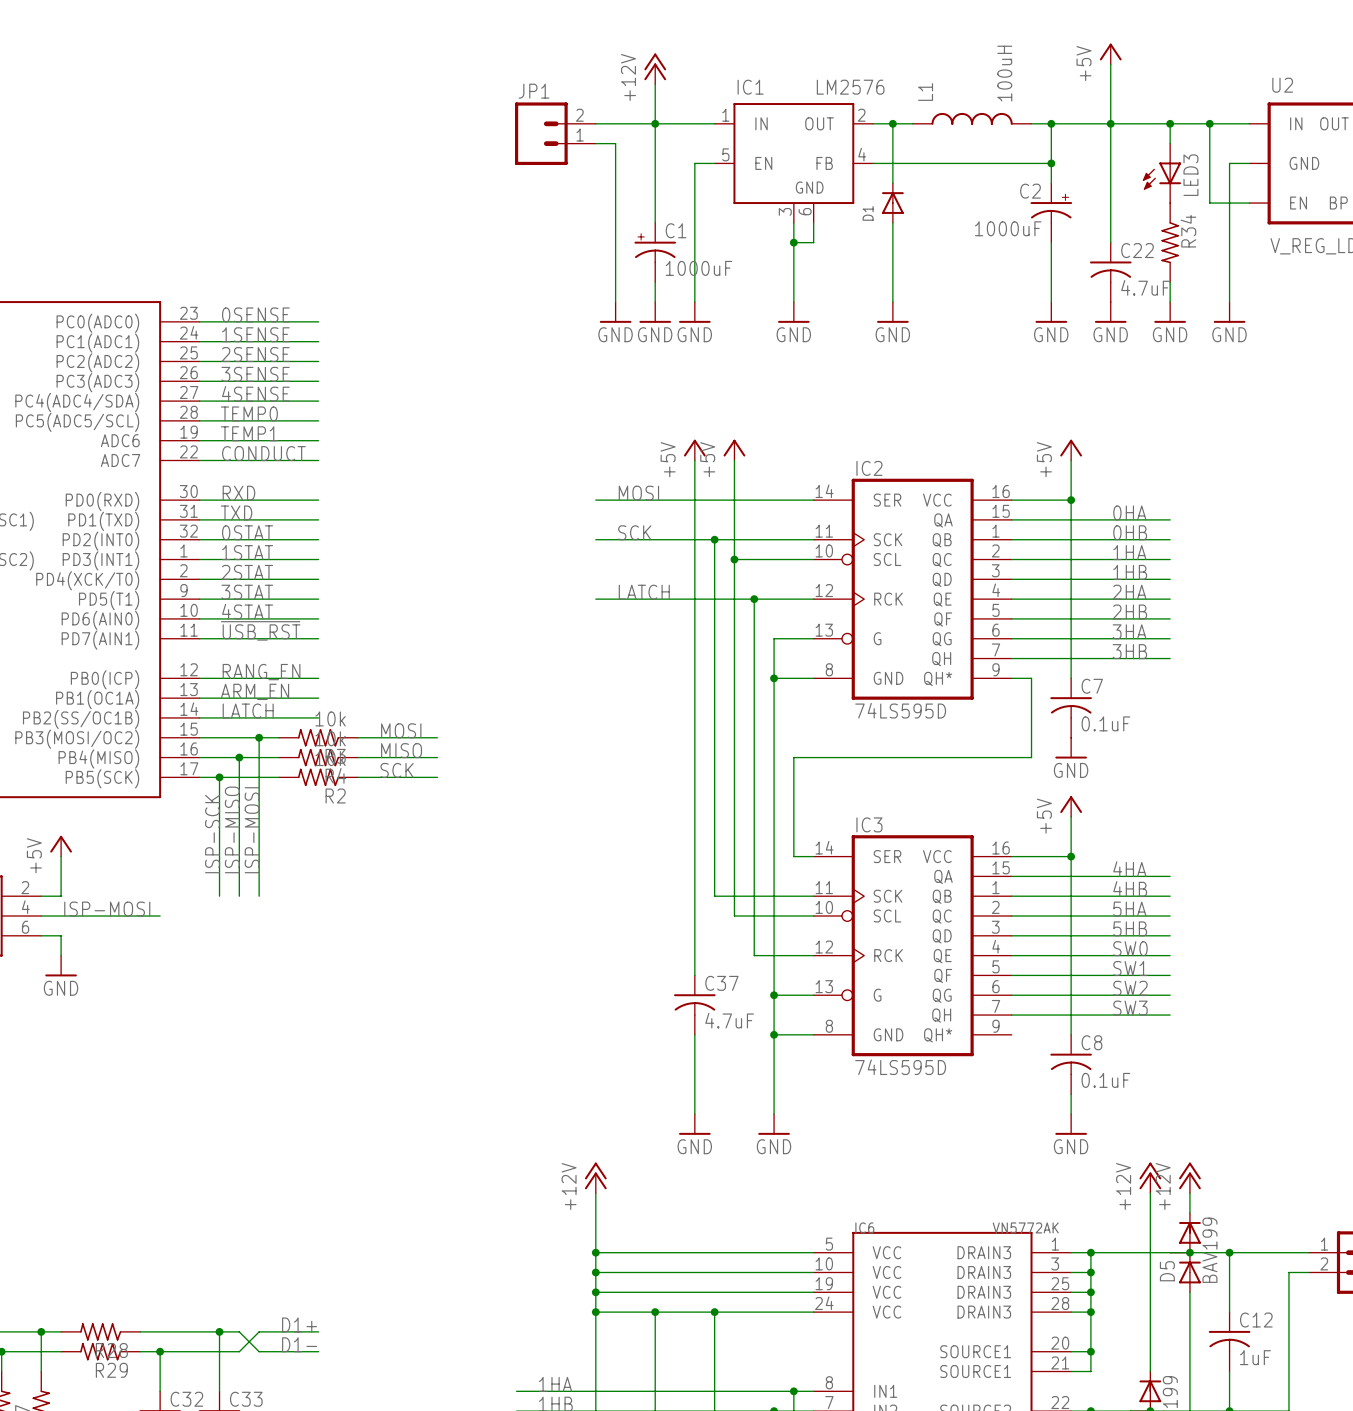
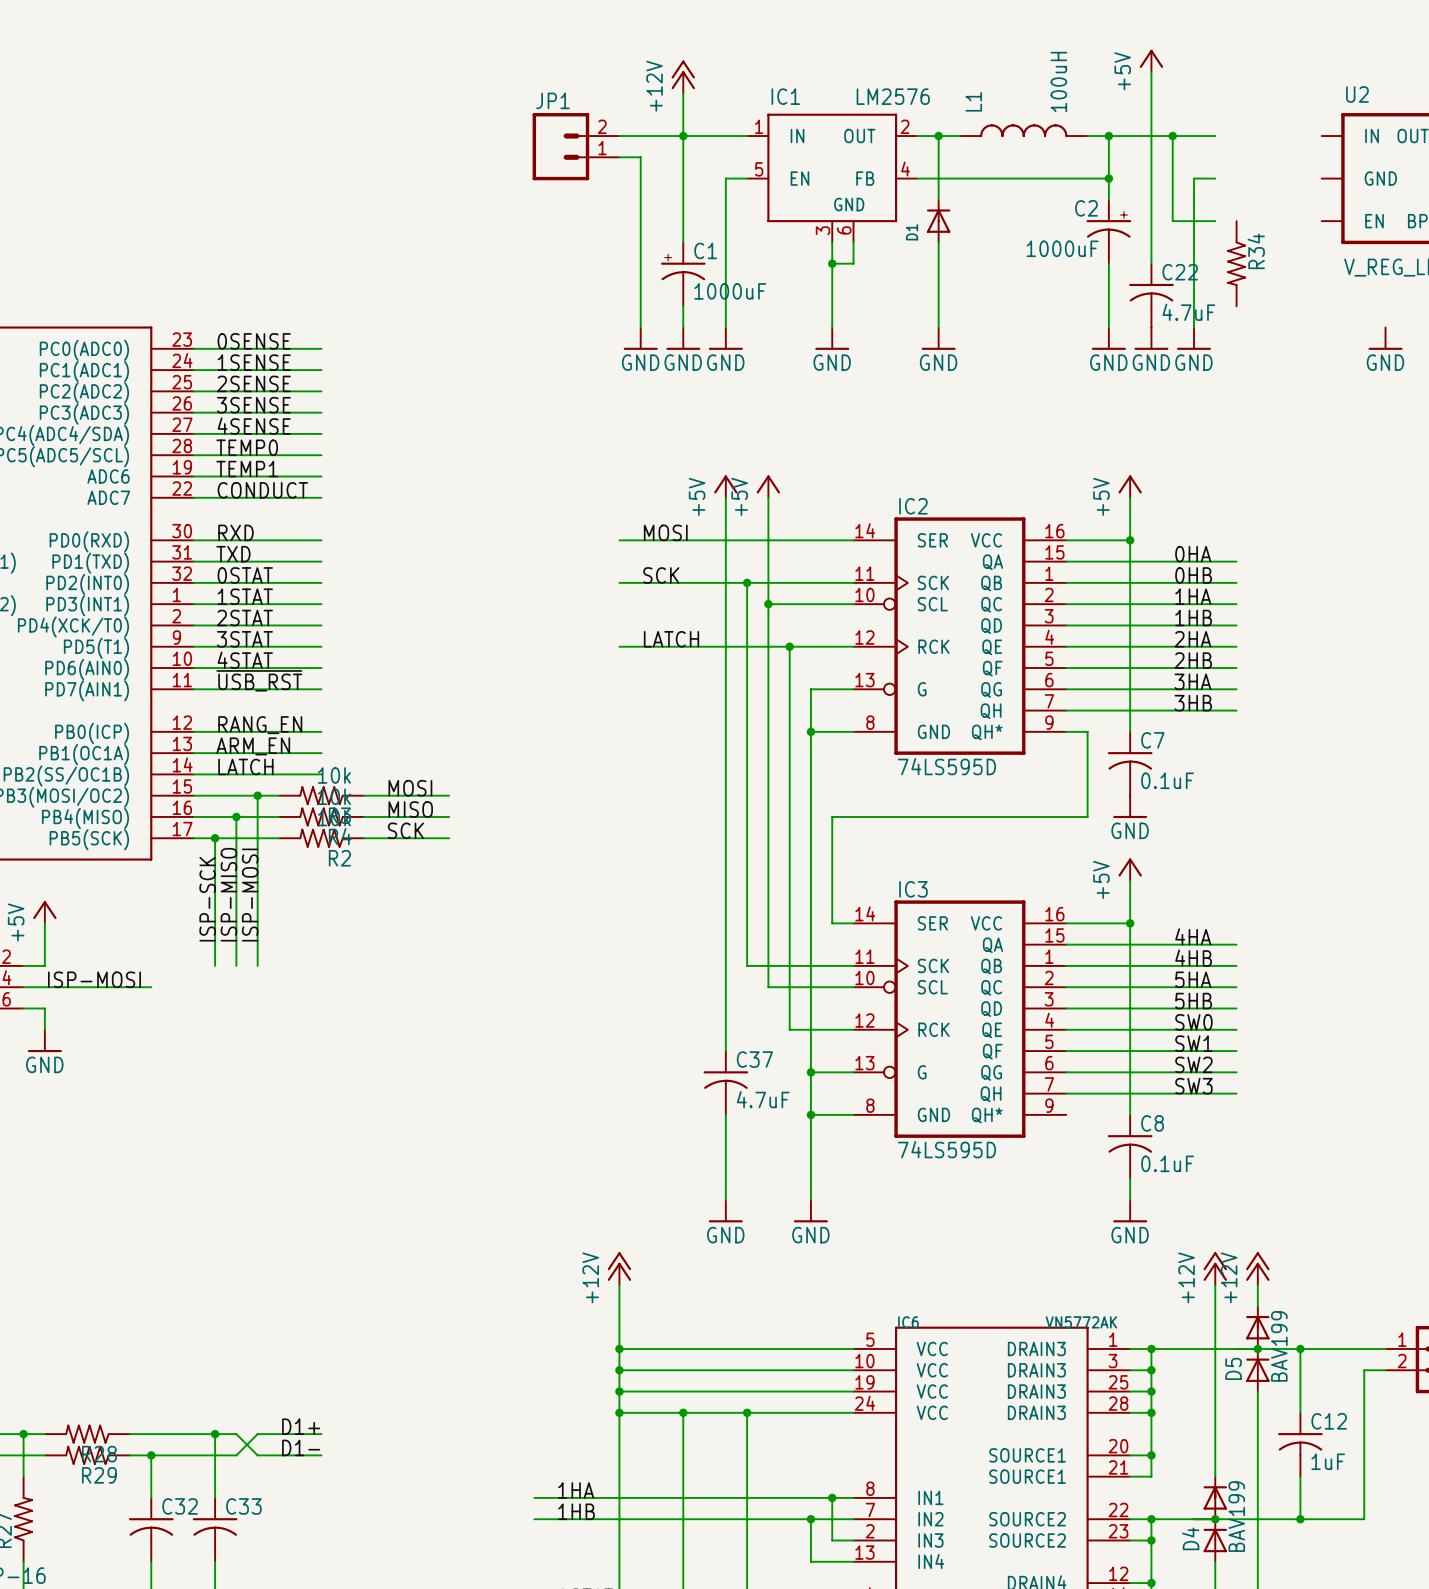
power symbol position: +5V (1110, 54) -> +5V (1151, 61)
wire: none -> (1151, 72) (1151, 263)
wire: (1110, 64) (1110, 123) -> none
wire: (1150, 123) (1249, 123) -> none
wire: (1170, 123) (1170, 143) -> none
junction: (1170, 123) -> none
wire: (1209, 123) (1209, 203) (1249, 203) -> none
junction: (1209, 123) -> none
wire: (1249, 163) (1229, 163) (1229, 302) -> (1215, 178) (1194, 178) (1194, 327)
LED3: (1161, 173) -> none
wire: (1110, 203) (1110, 242) -> (1172, 221) (1215, 221)
C22 position: (1110, 272) -> (1151, 295)
wire: (1170, 282) (1170, 302) -> none
power symbol: none -> GND (1151, 338)
power symbol: GND (1110, 312) -> none
power symbol: none -> GND (1194, 338)
power symbol: GND (1170, 312) -> none
power symbol: GND (1229, 312) -> none
power symbol: none -> GND (1385, 338)

